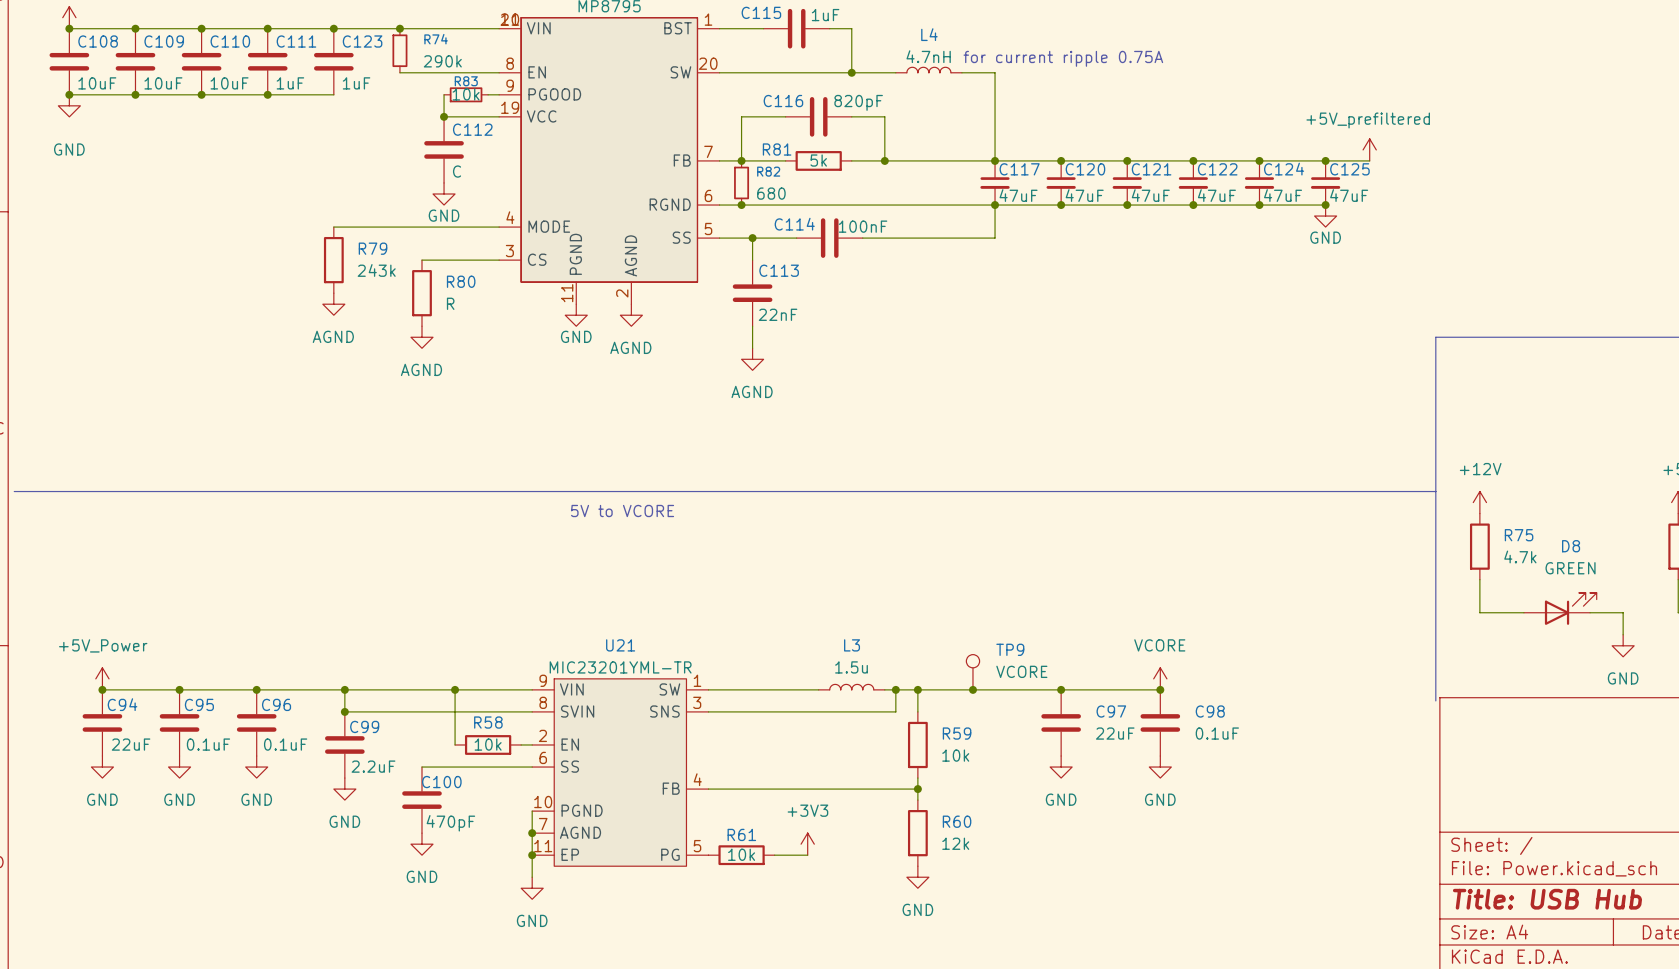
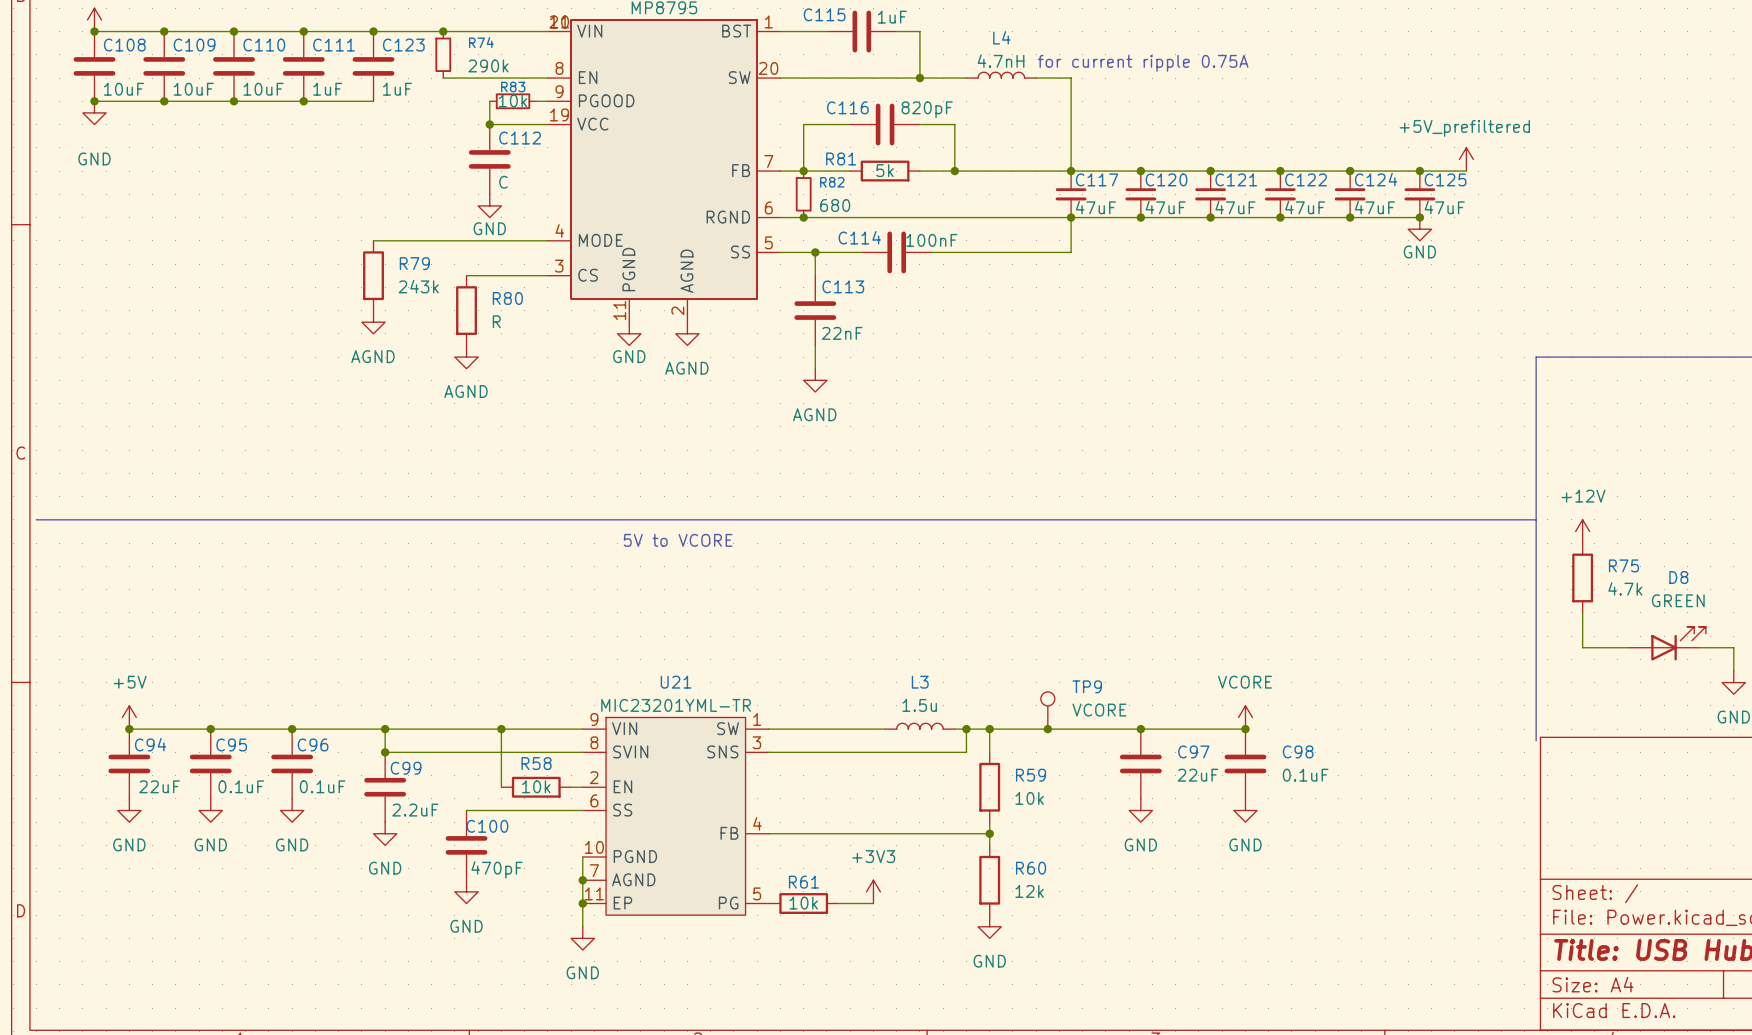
power symbol: +5V_Power (102, 678) -> +5V (129, 717)

